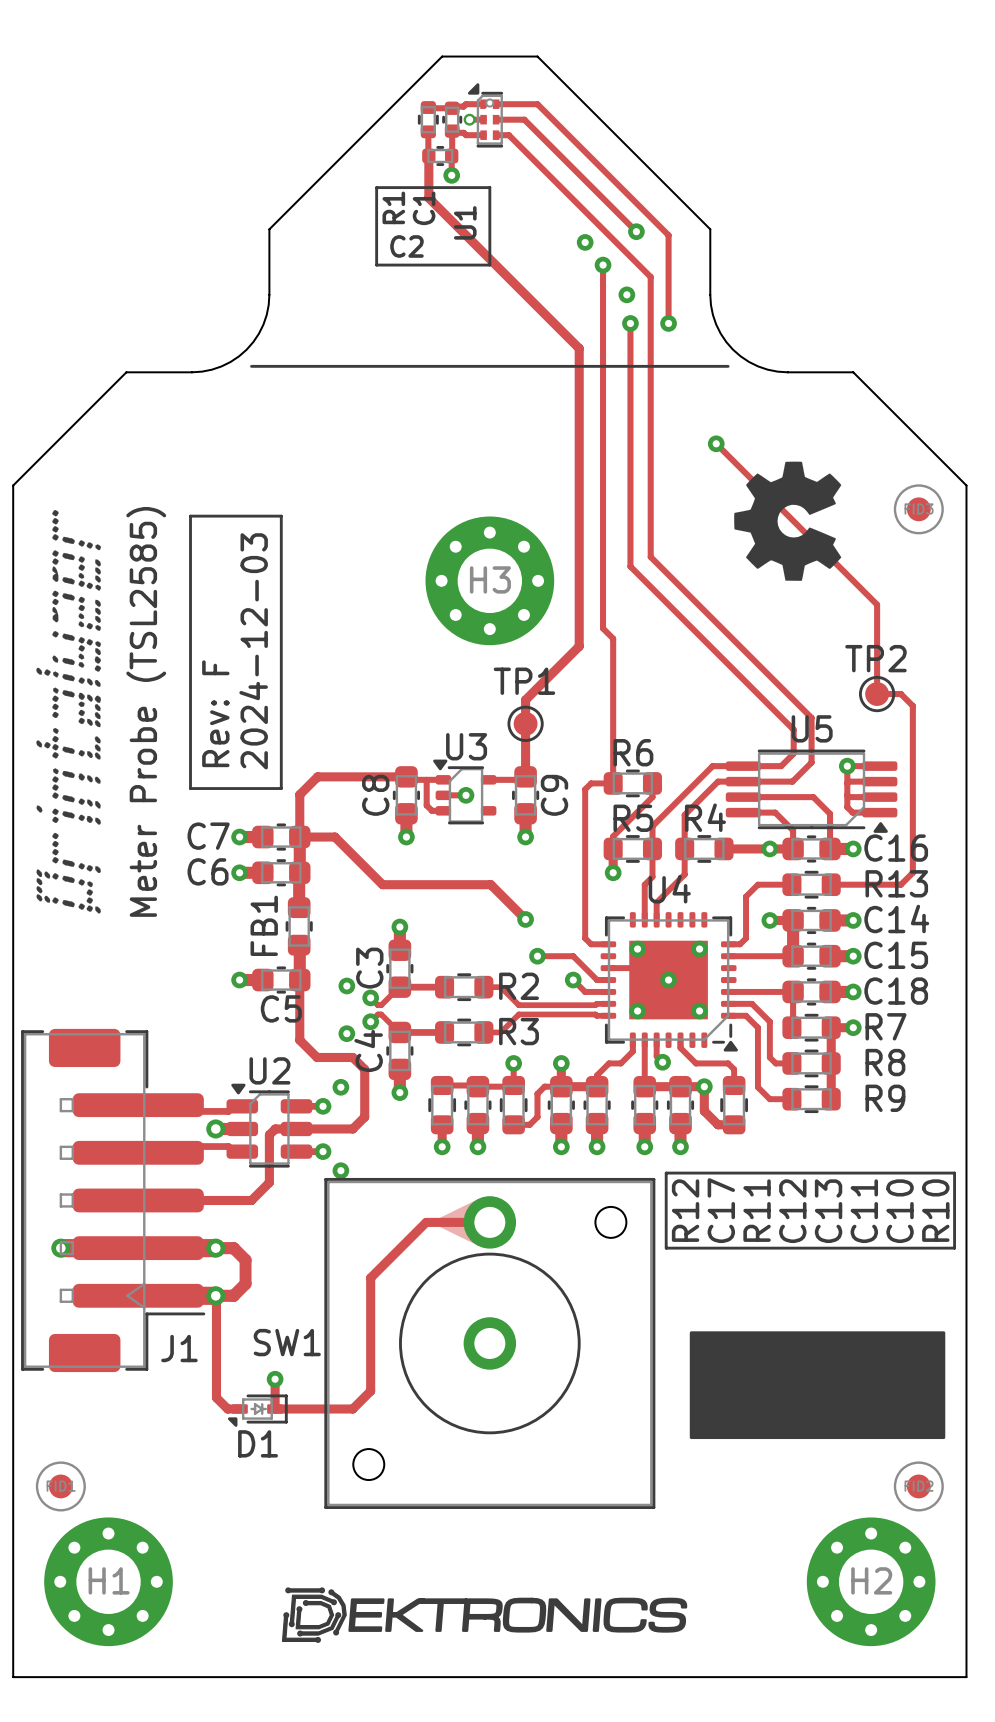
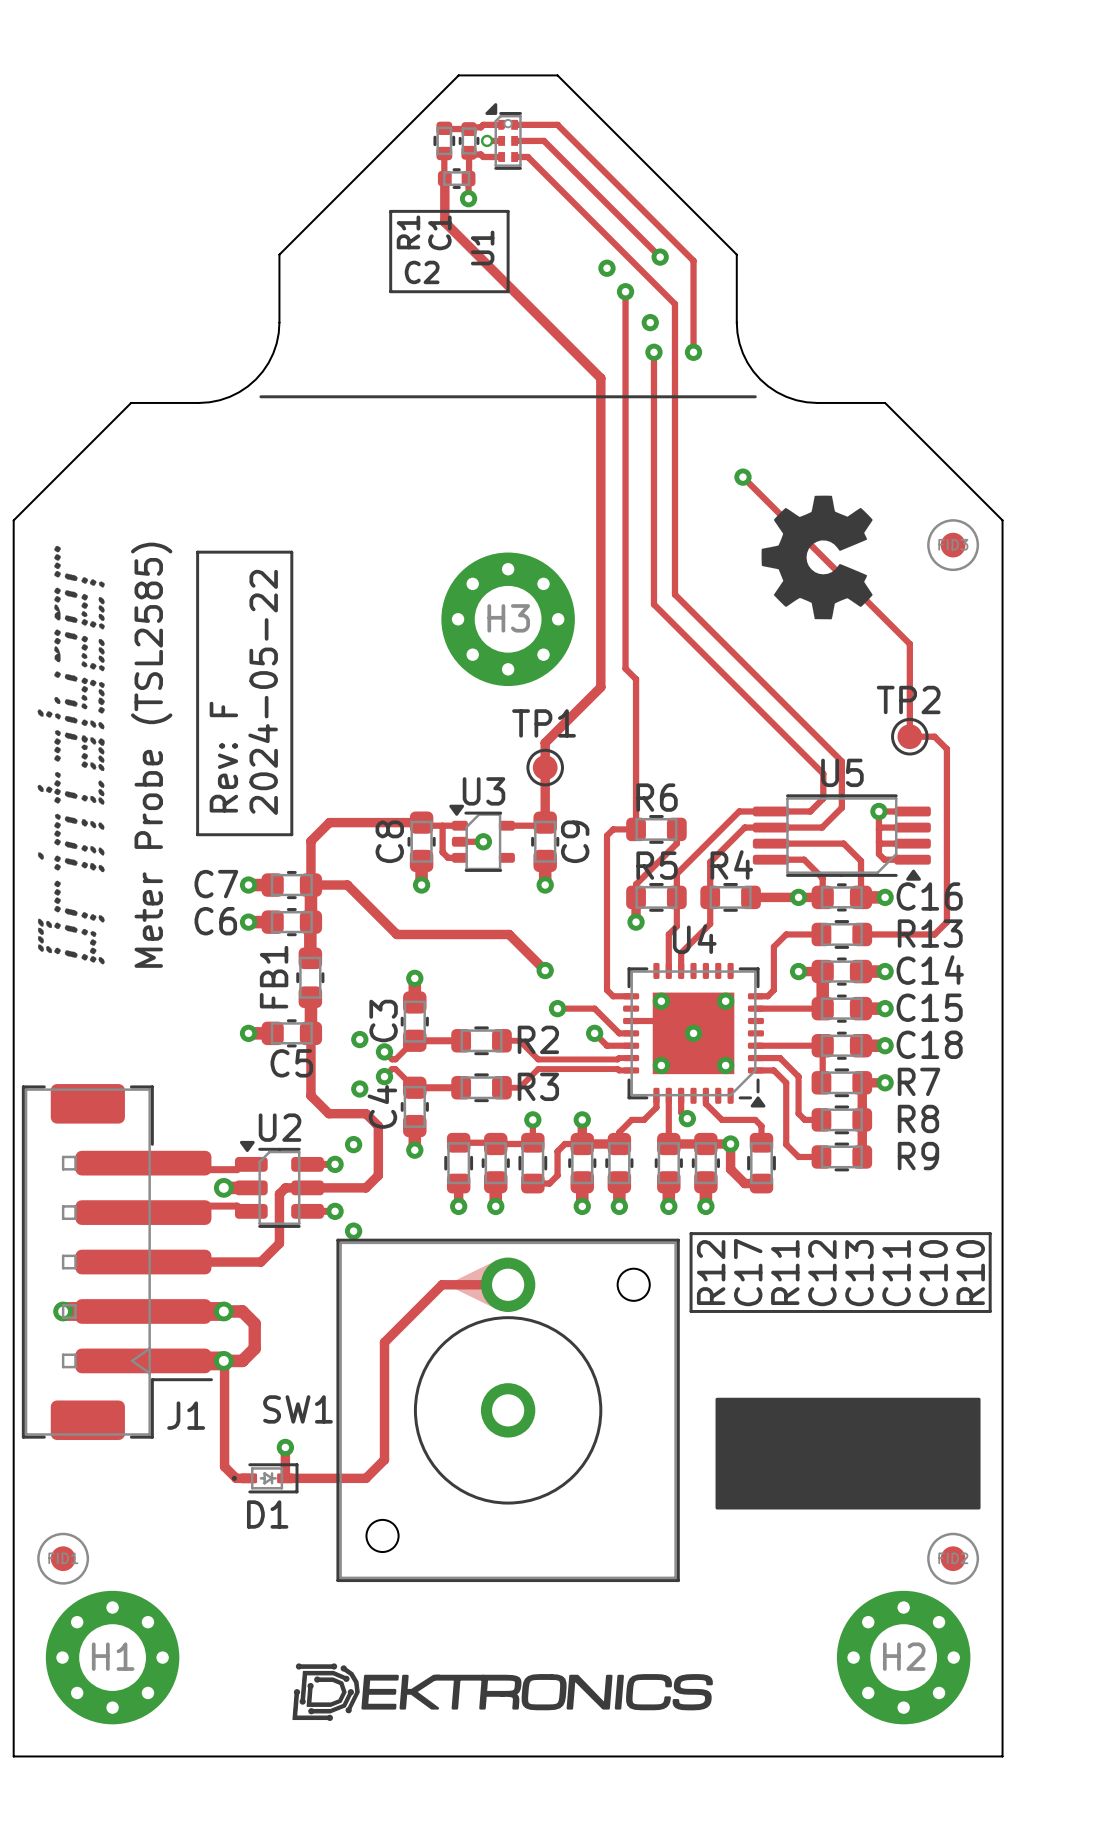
text: 2024-12-03 (253, 651) -> 2024-05-22 (263, 692)
D1 footprint: [227, 1394, 288, 1427] -> [231, 1463, 299, 1494]

